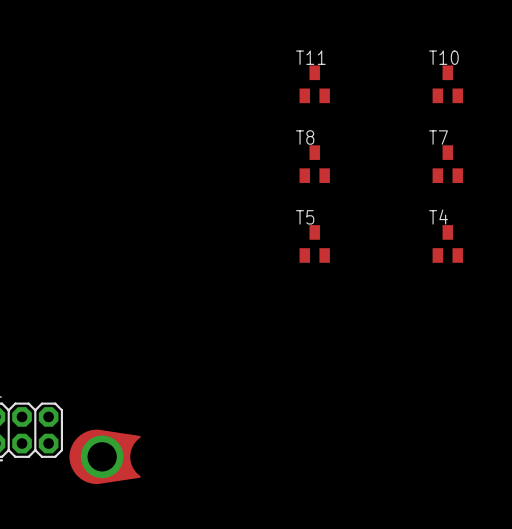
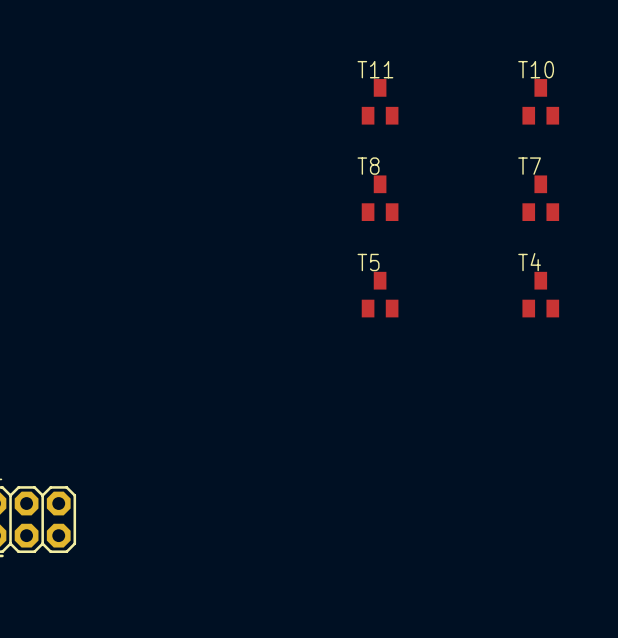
part: (104, 456) -> none

